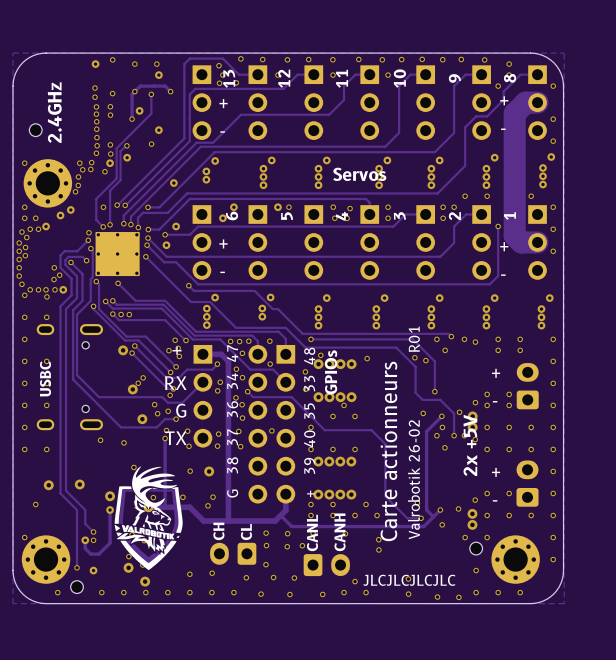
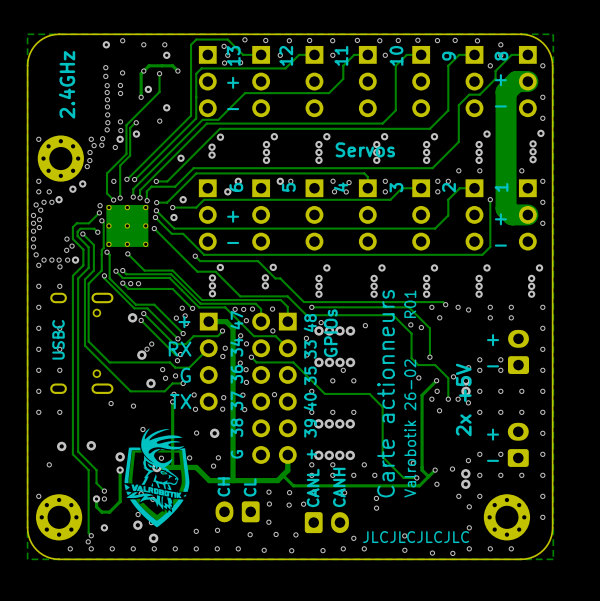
part: (35, 130) -> none
part: (476, 548) -> none
via: none -> (469, 506)
track: none -> (88, 525) (88, 533) (91, 535)
via: (77, 567) -> none
via: none -> (91, 535)
via: none -> (88, 541)
part: (77, 587) -> none
via: none -> (91, 548)

